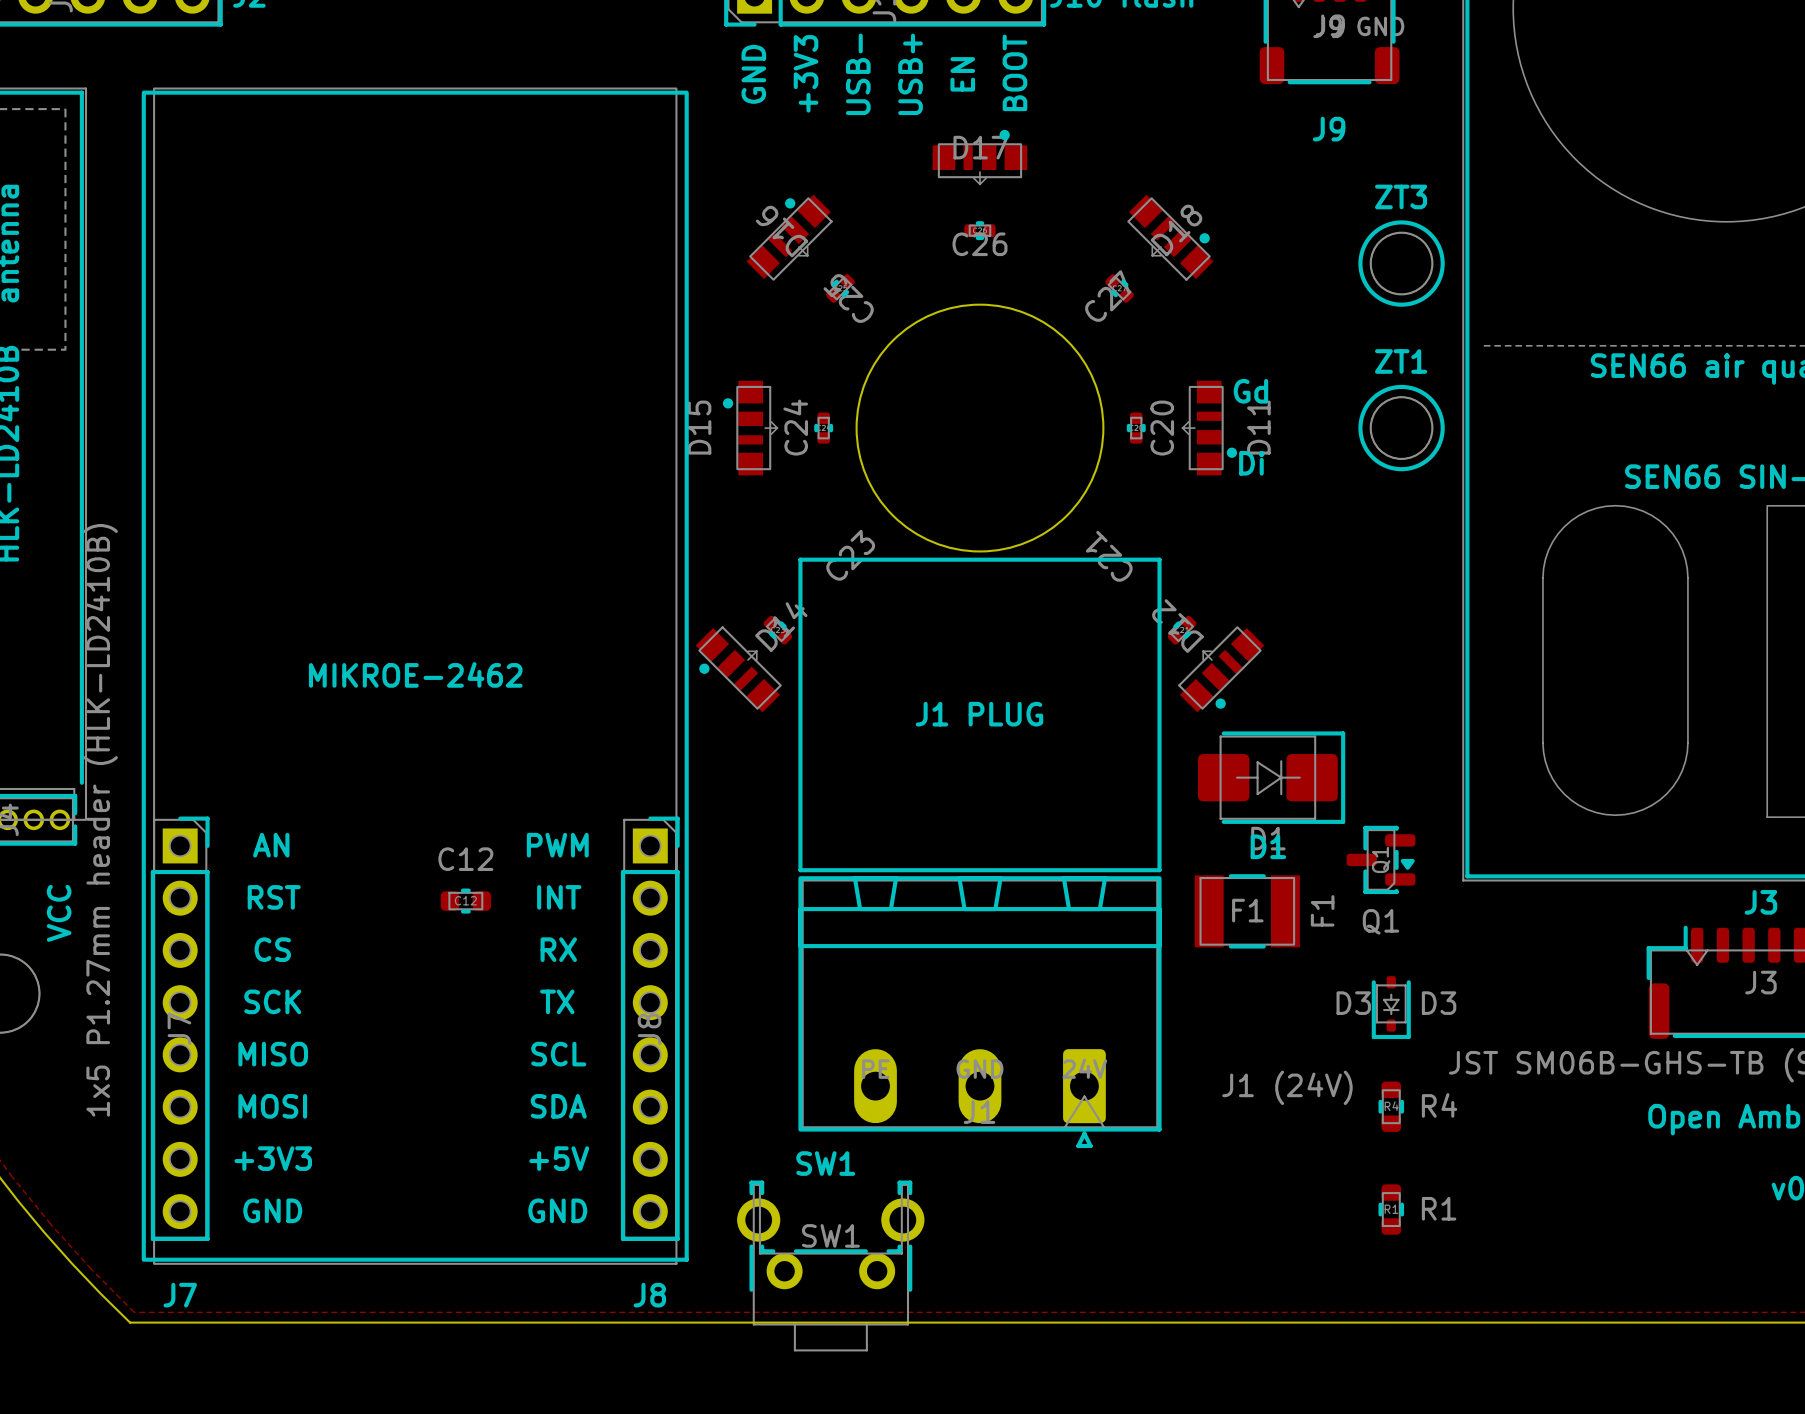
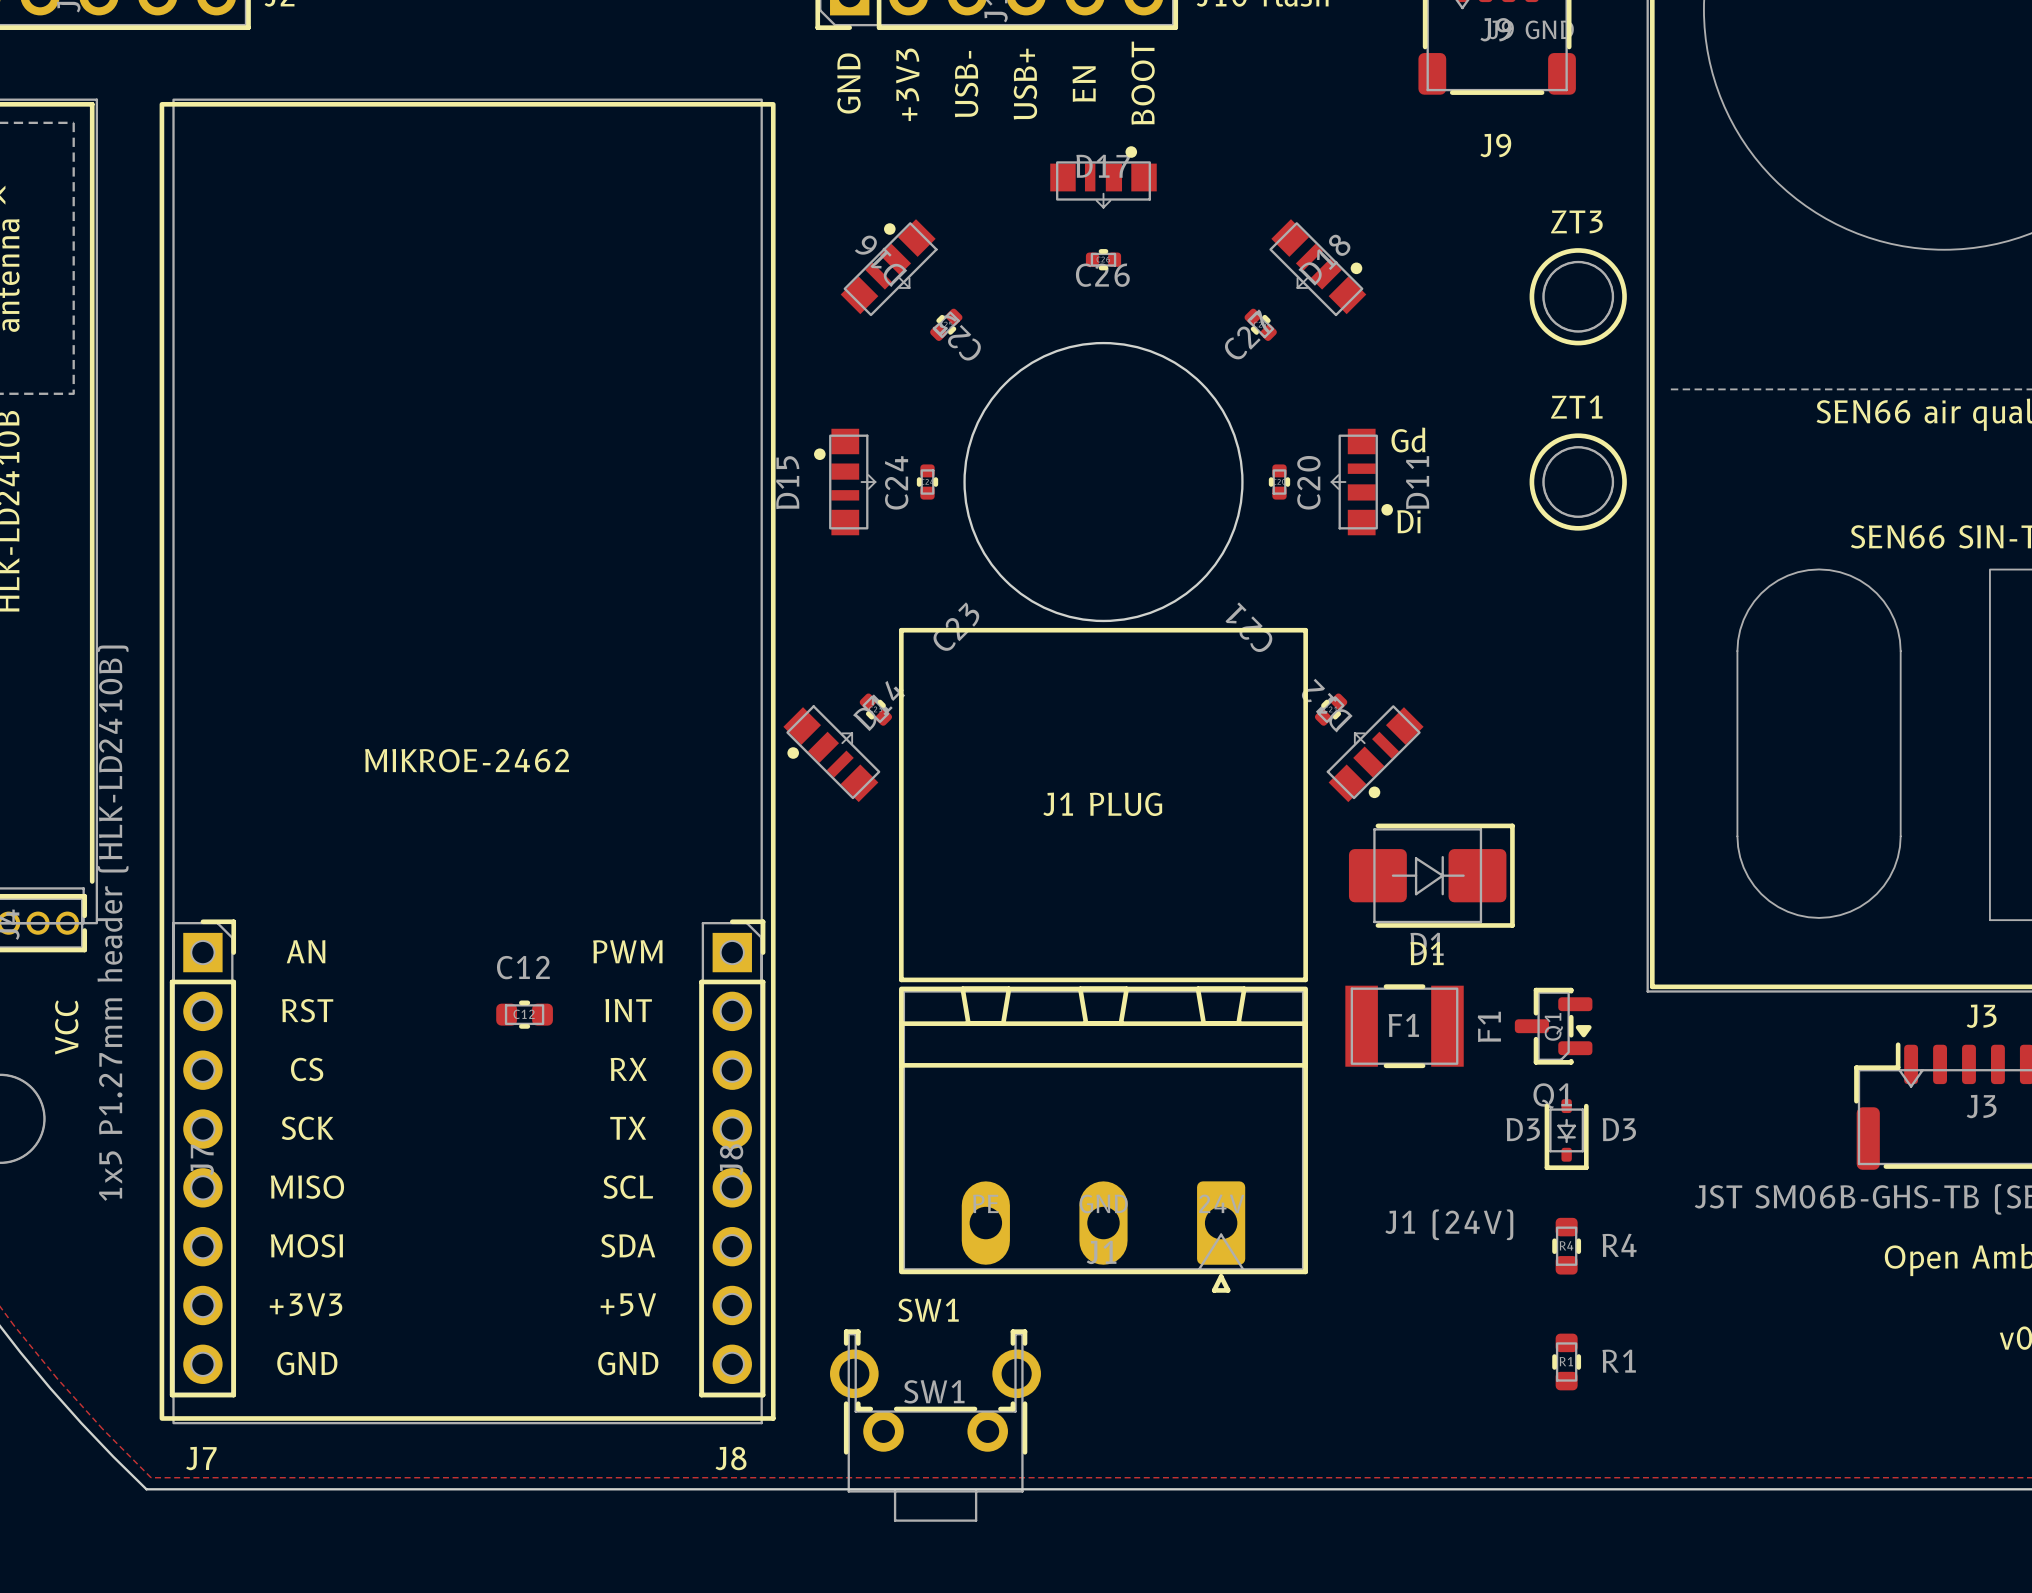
part position: (1381, 859) -> (1553, 1026)
text position: Q1 (1381, 921) -> Q1 (1552, 1095)

